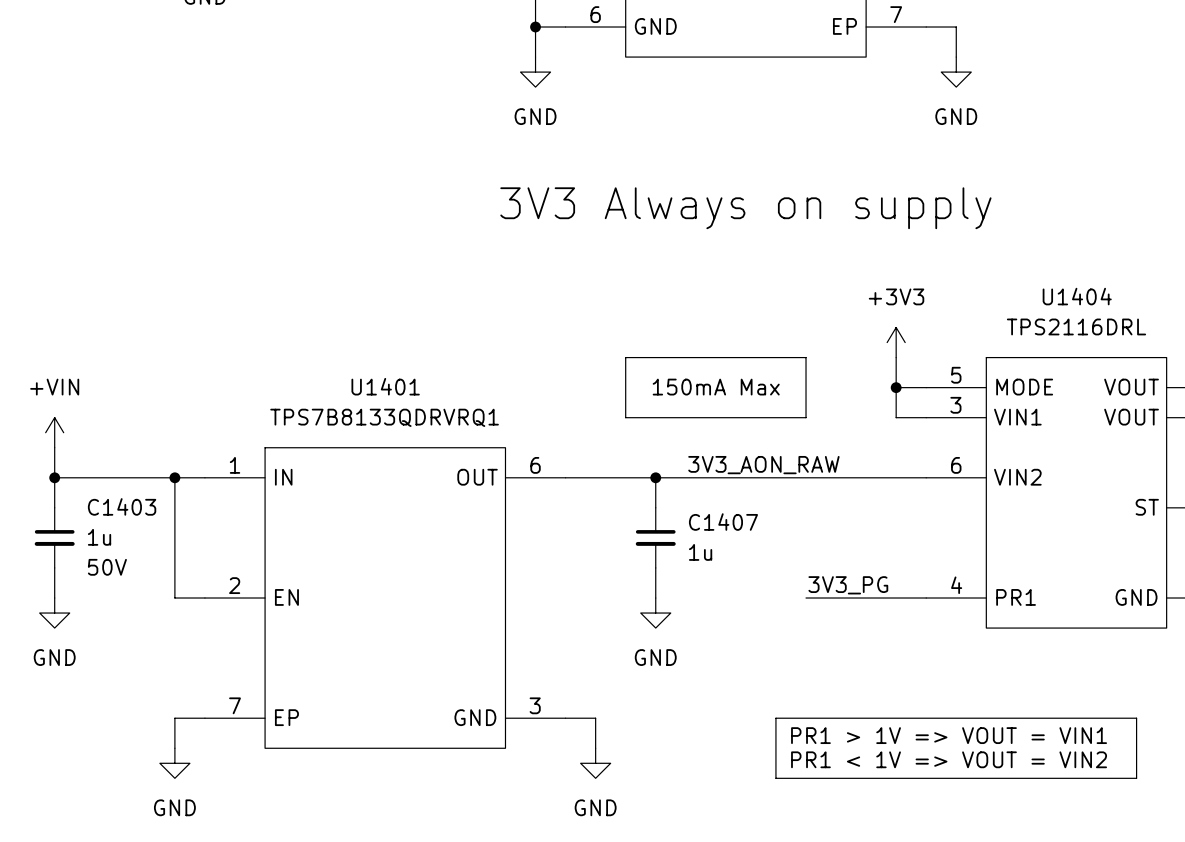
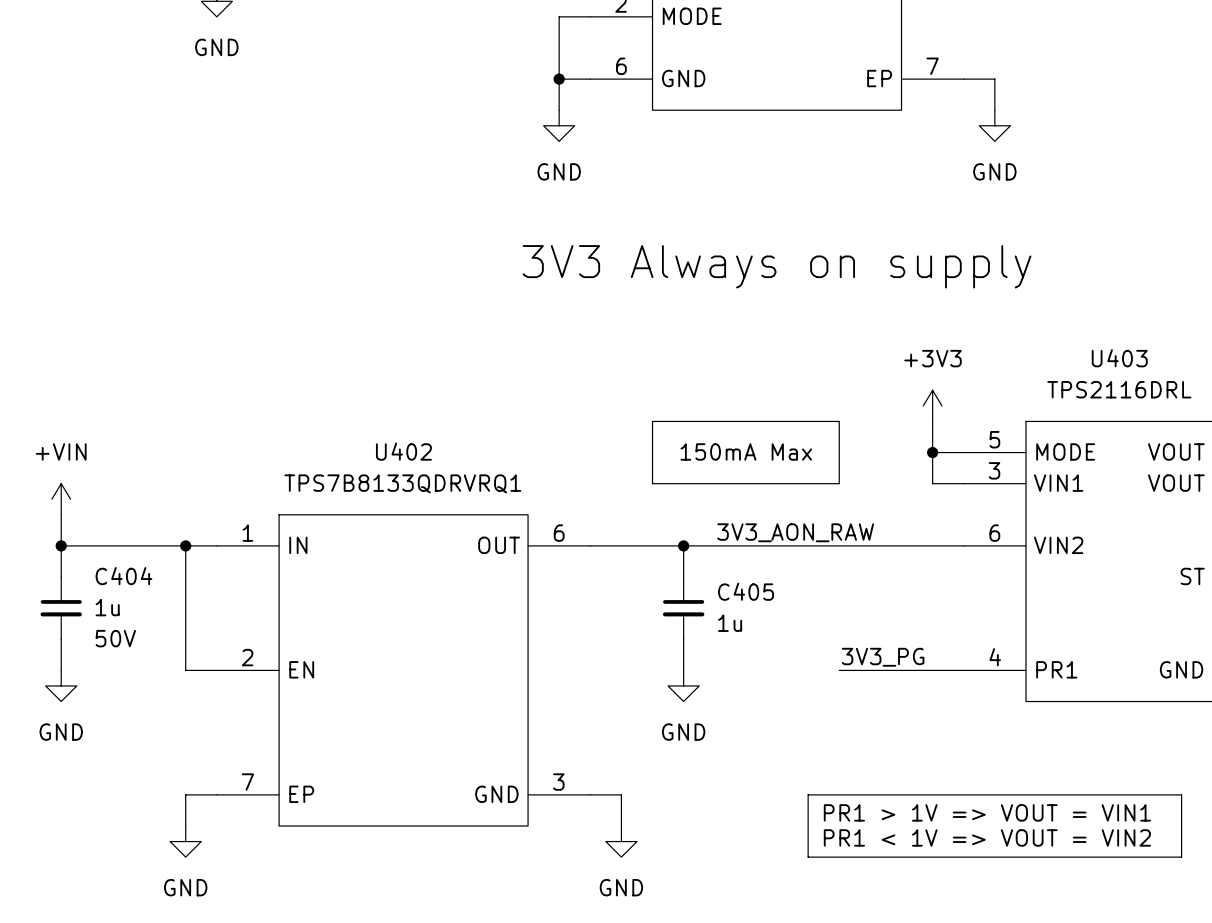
U1404 name: U1404 (1077, 296) -> U403 (1119, 358)
U1401 name: U1401 (385, 386) -> U402 (403, 451)
C1403 name: C1403 (122, 506) -> C404 (123, 576)
C1407 name: C1407 (723, 522) -> C405 (746, 591)

